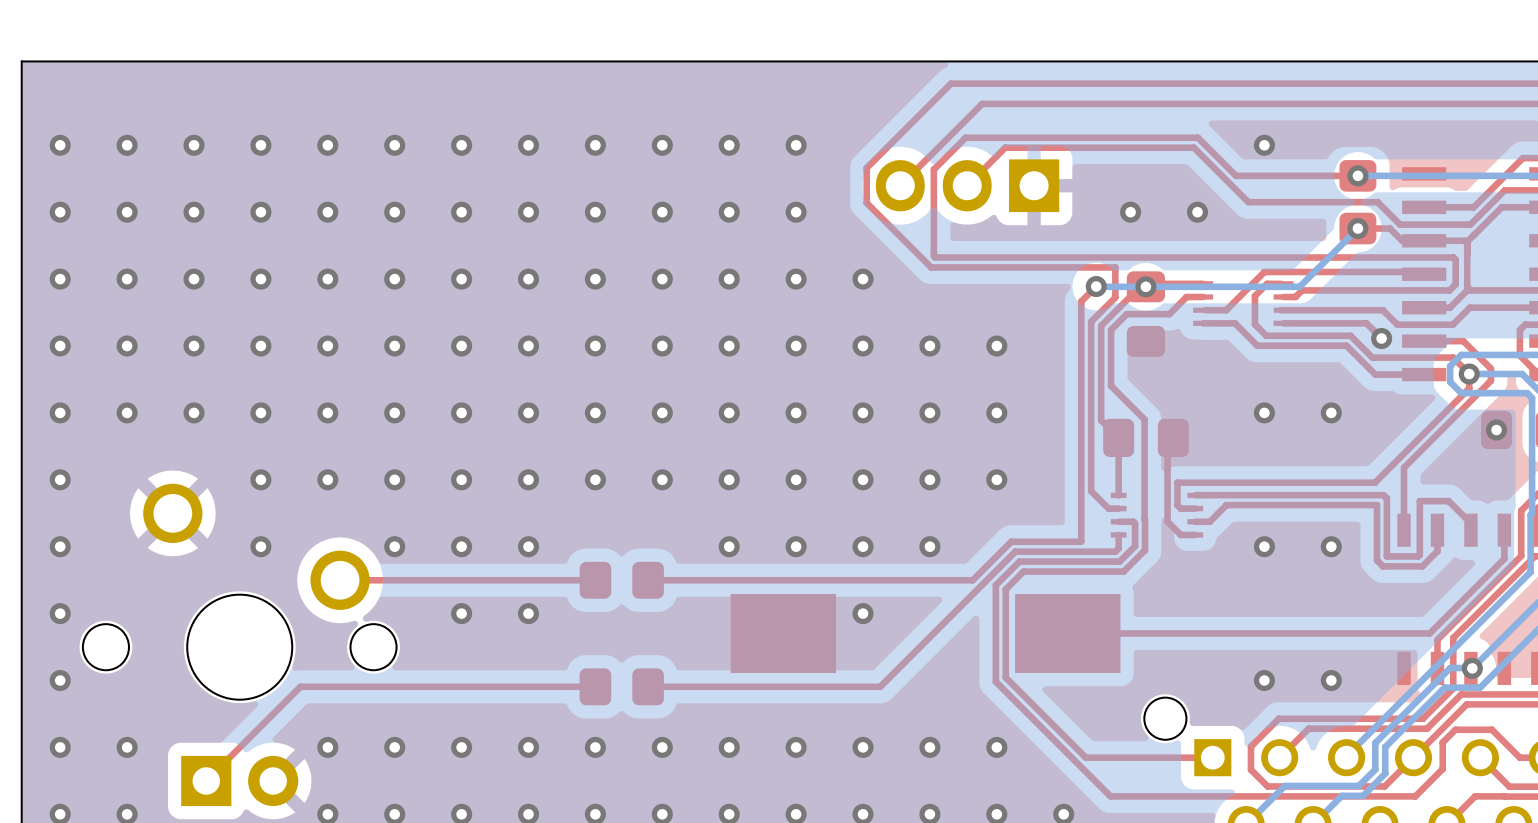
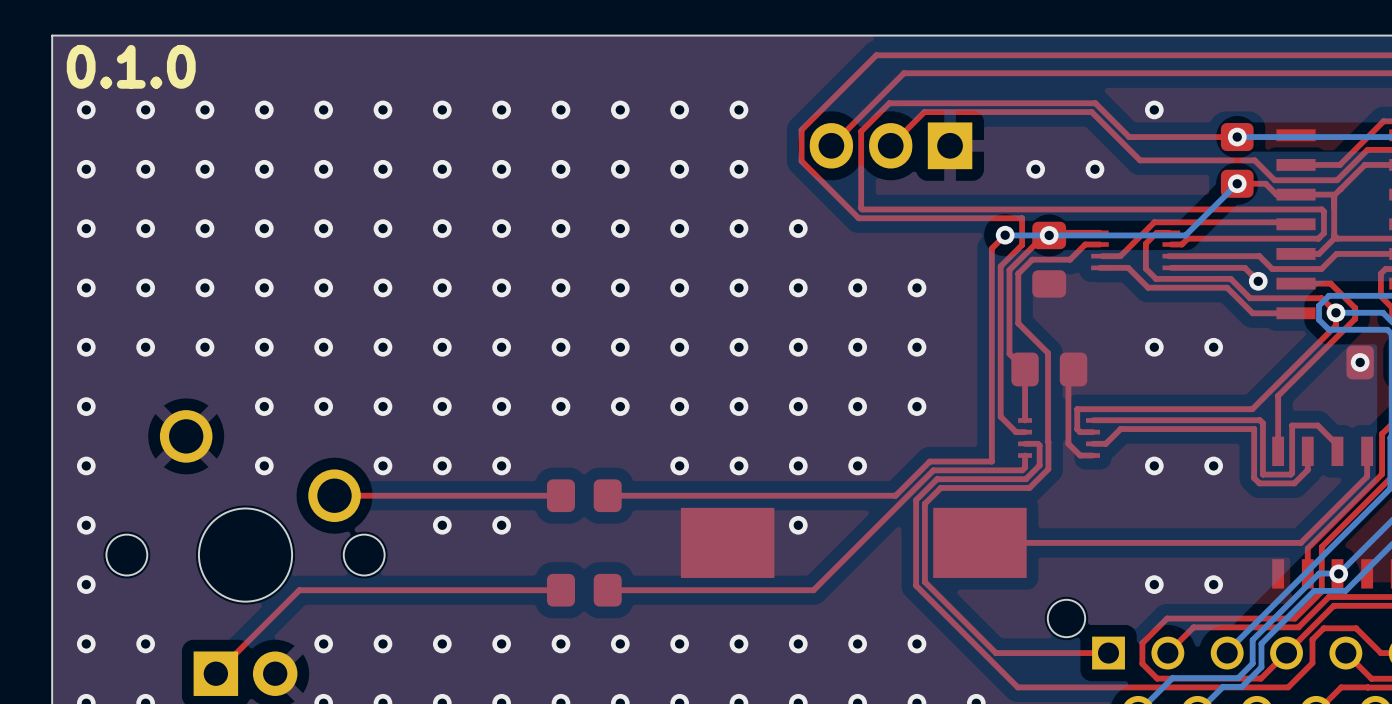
text: none -> 0.1.0 (131, 66)

